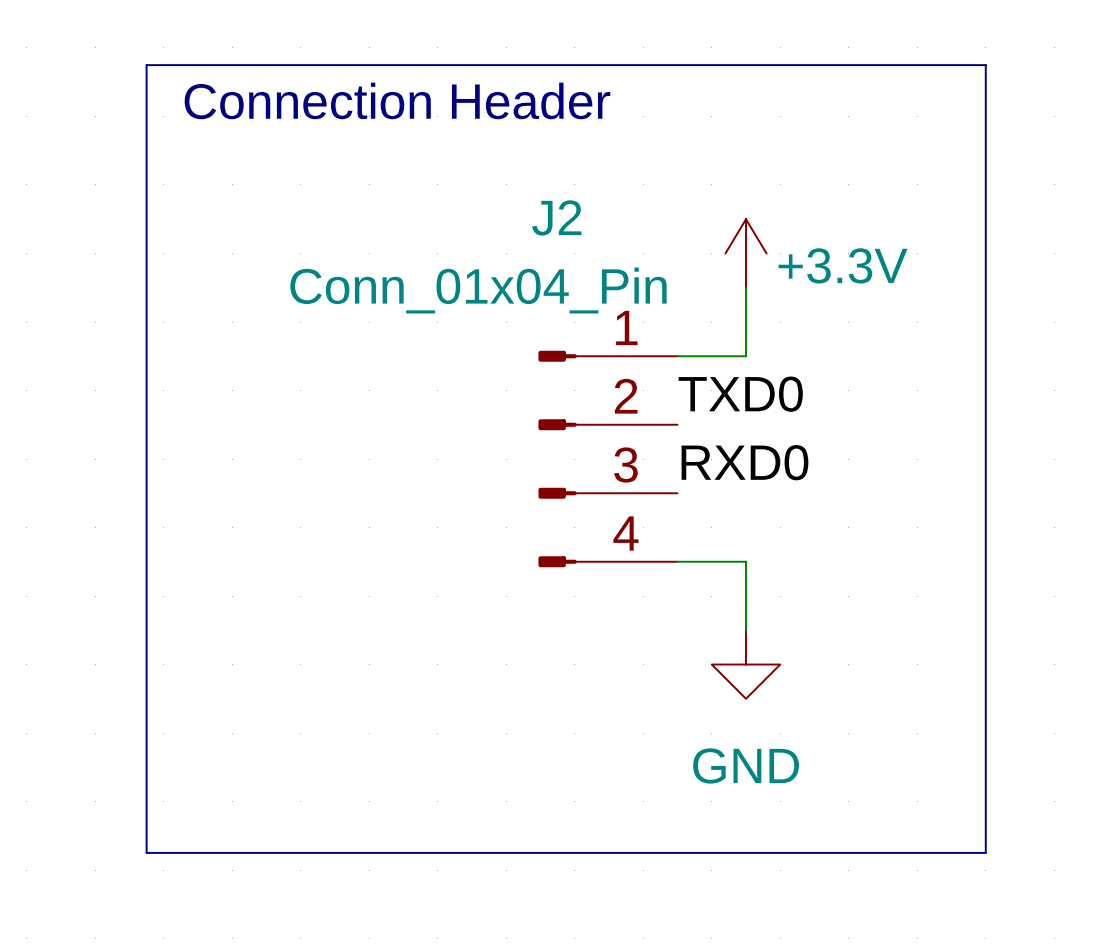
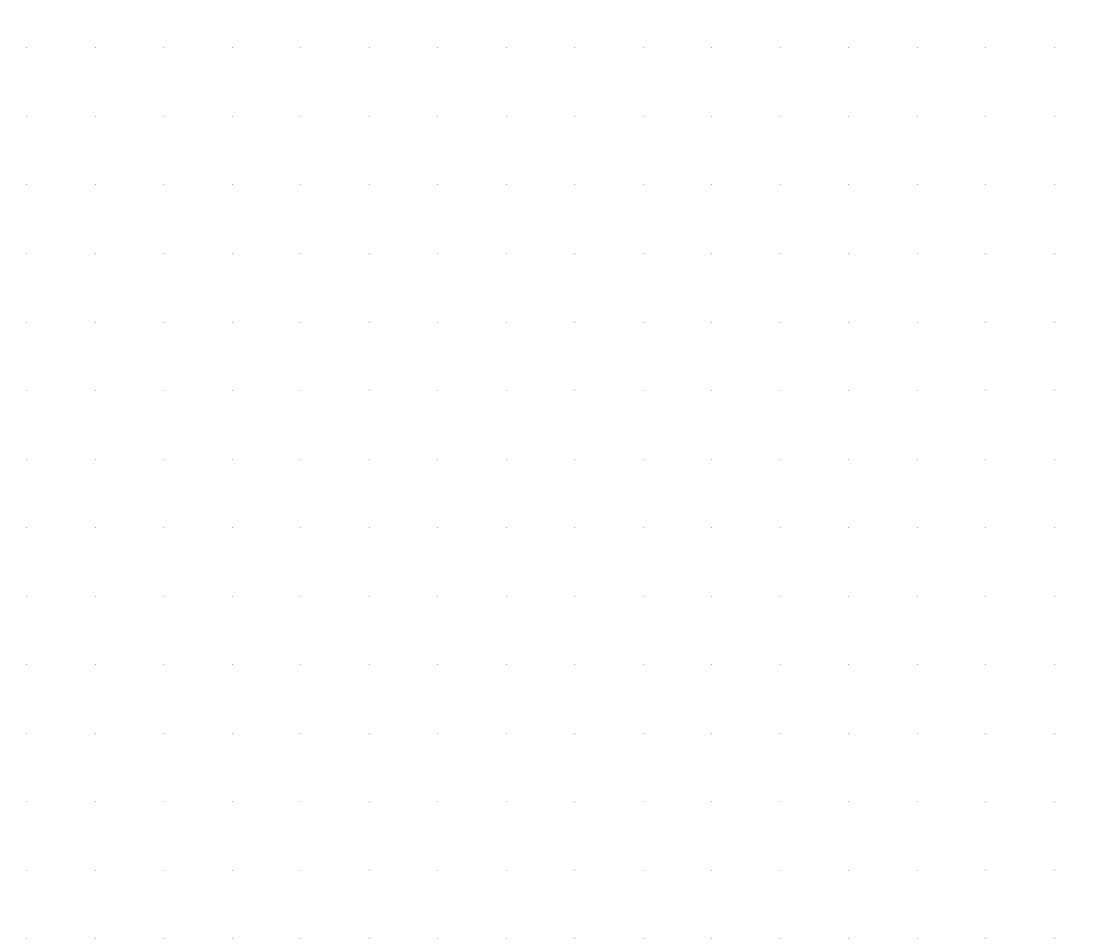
line: (146, 65) (985, 65) (985, 852) (146, 852) (146, 65) -> none
text: Connection Header (397, 100) -> none
power symbol: +3.3V (746, 253) -> none
wire: (746, 287) (746, 356) (677, 356) -> none
label: TXD0 (740, 394) -> none
J2: Conn_01x04_Pin (607, 459) -> none
label: RXD0 (744, 462) -> none
wire: (677, 561) (746, 561) (746, 630) -> none
power symbol: GND (746, 664) -> none

